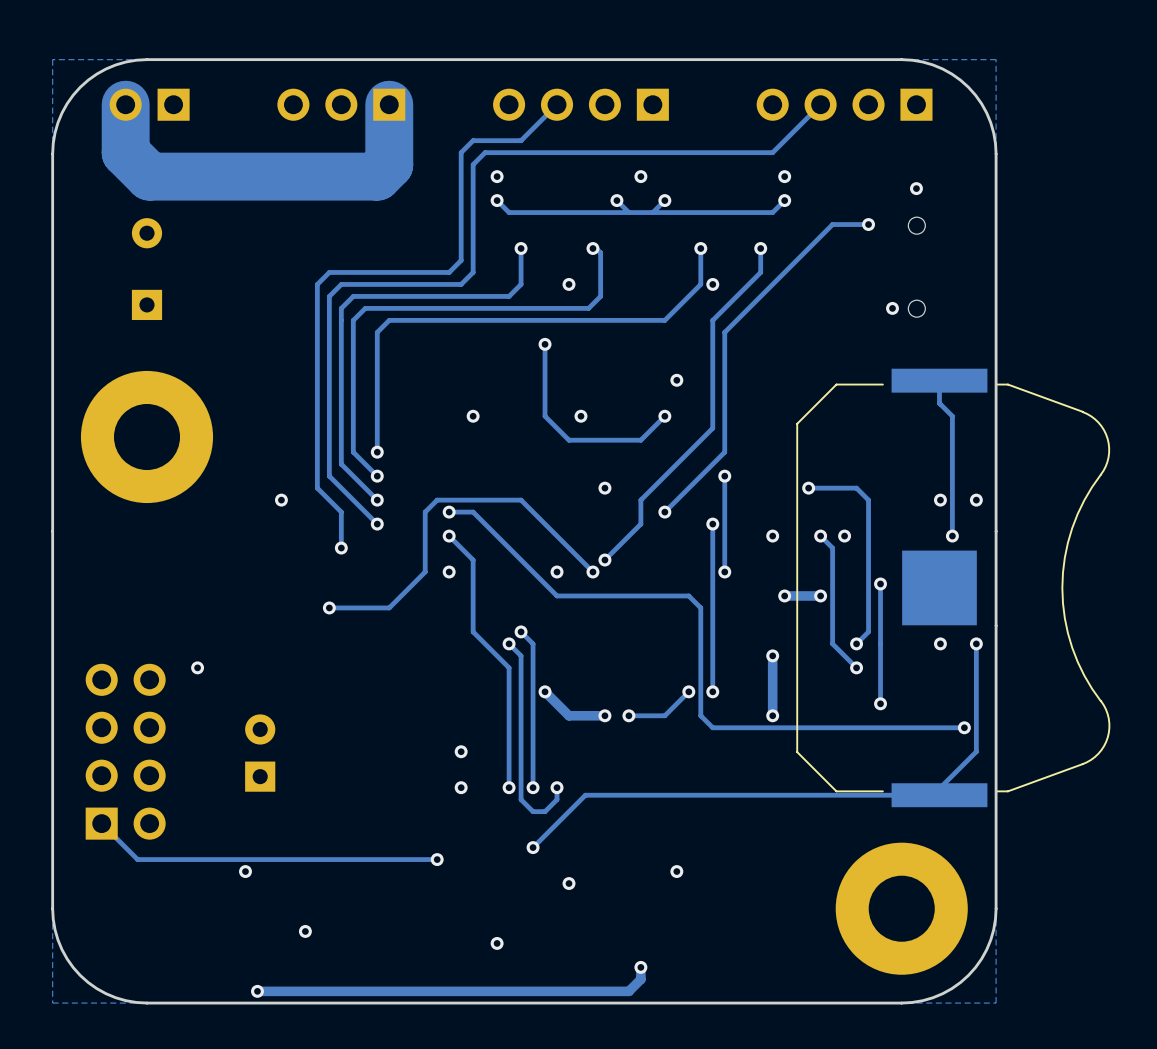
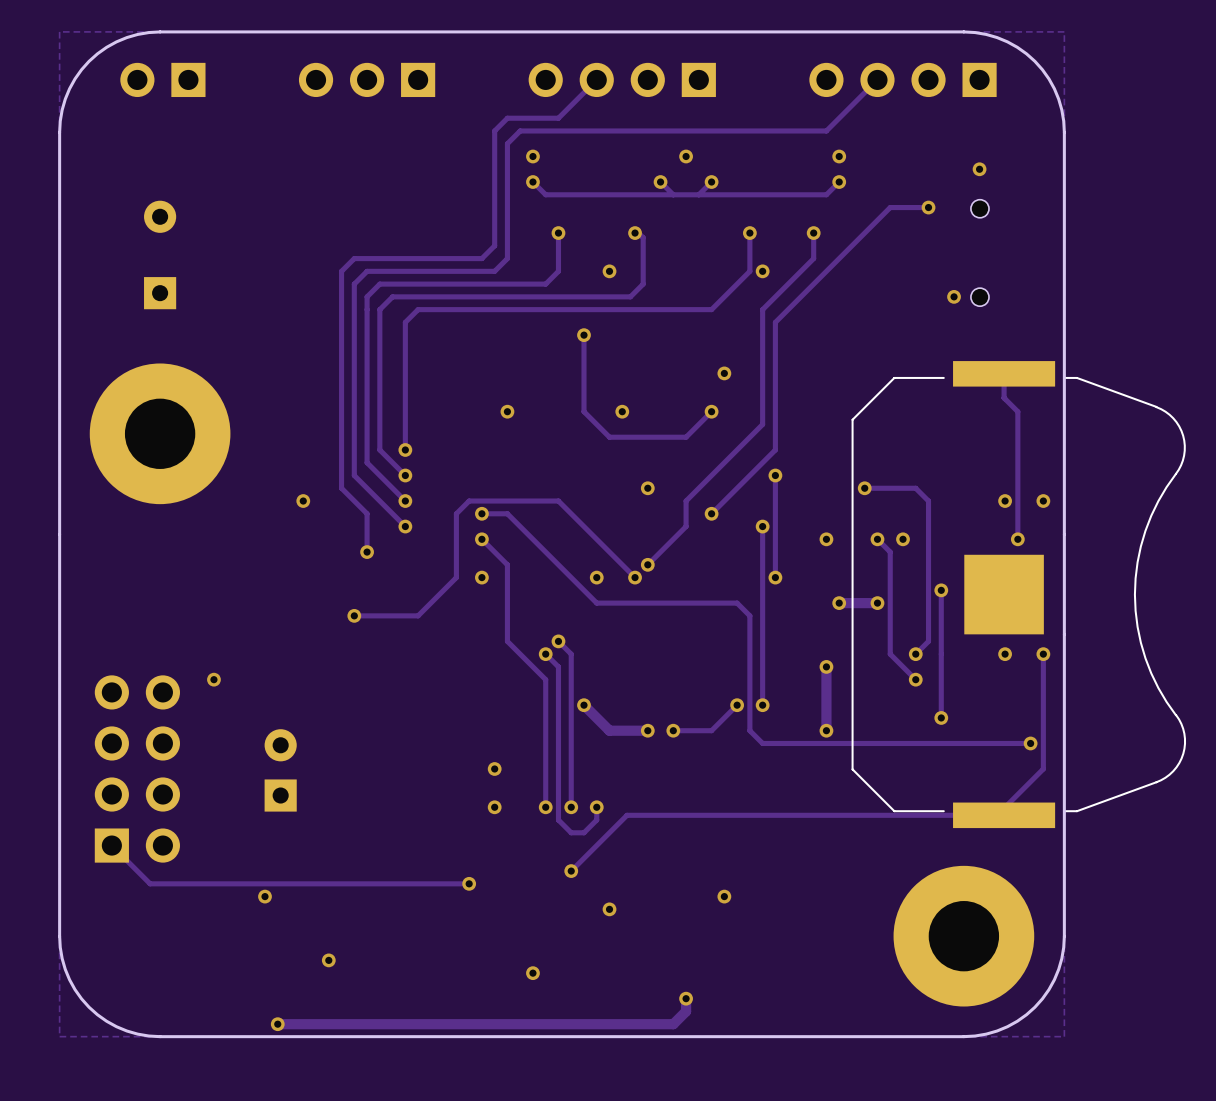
track: (389, 104) (389, 164) (377, 176) (149, 176) (125, 152) (125, 104) -> none

